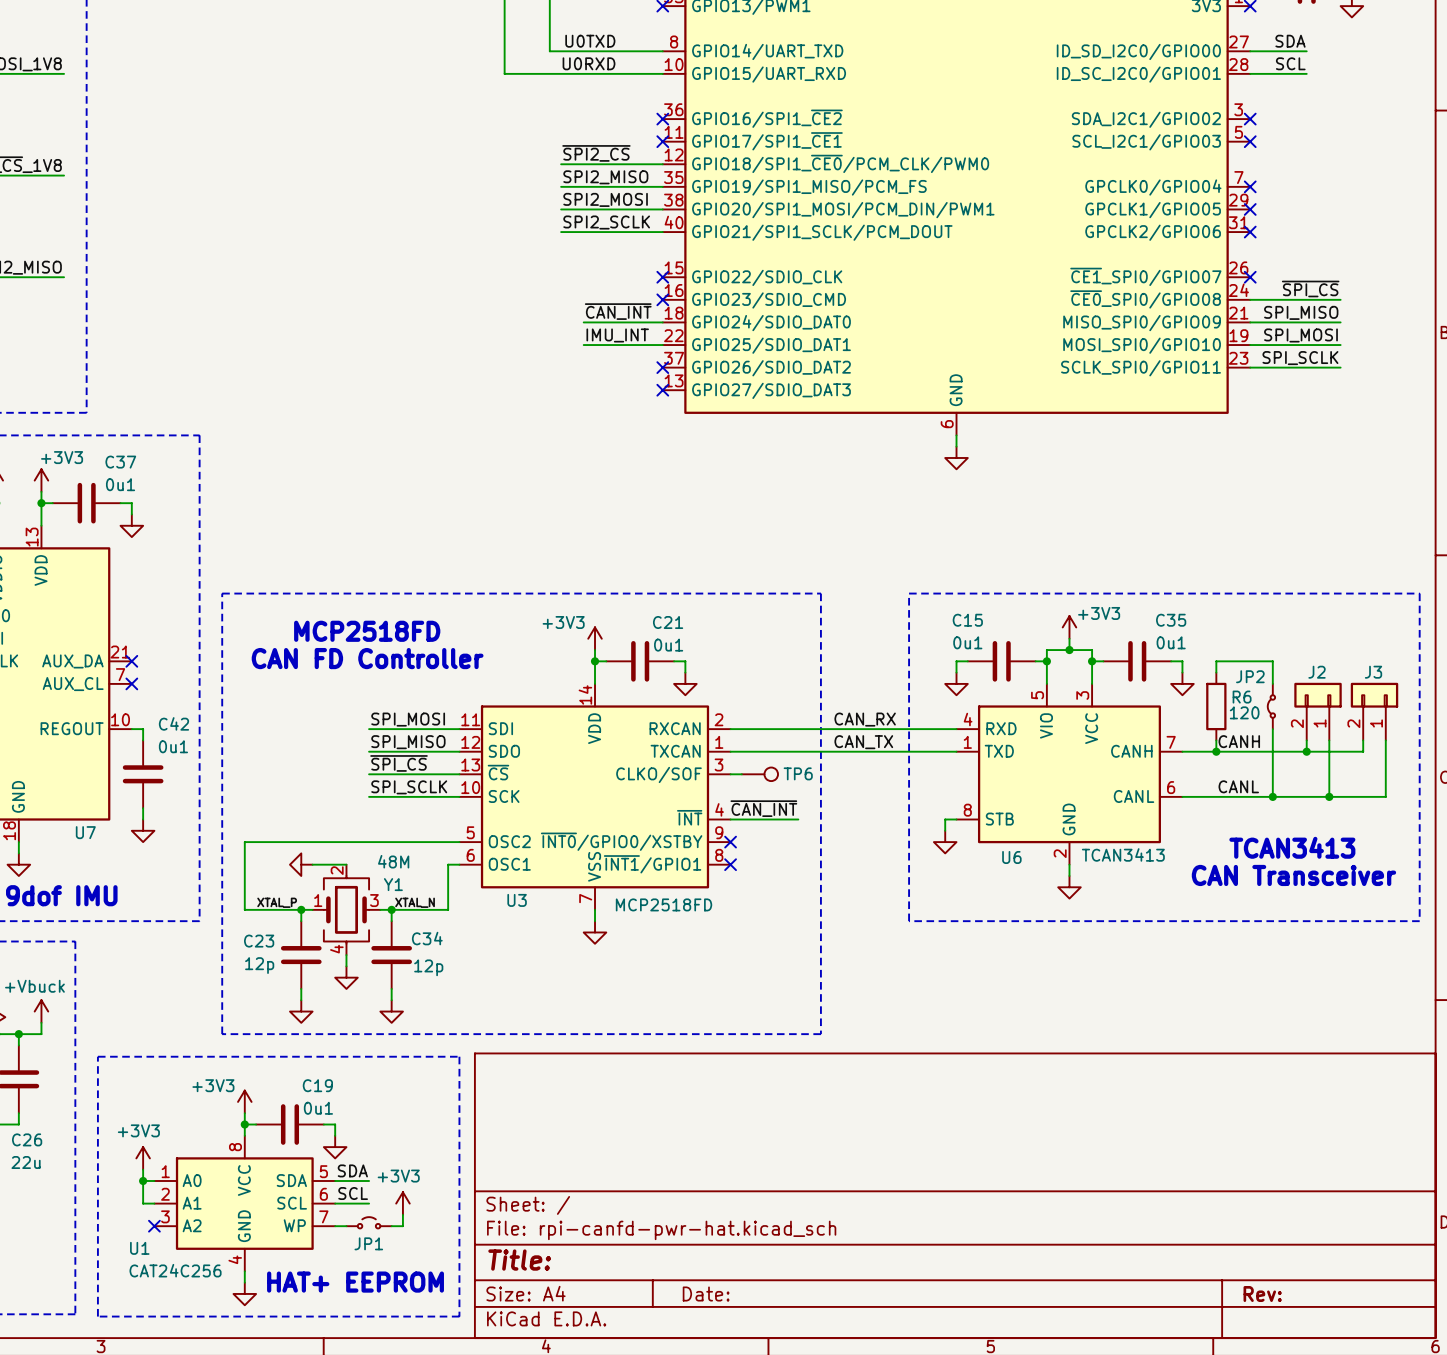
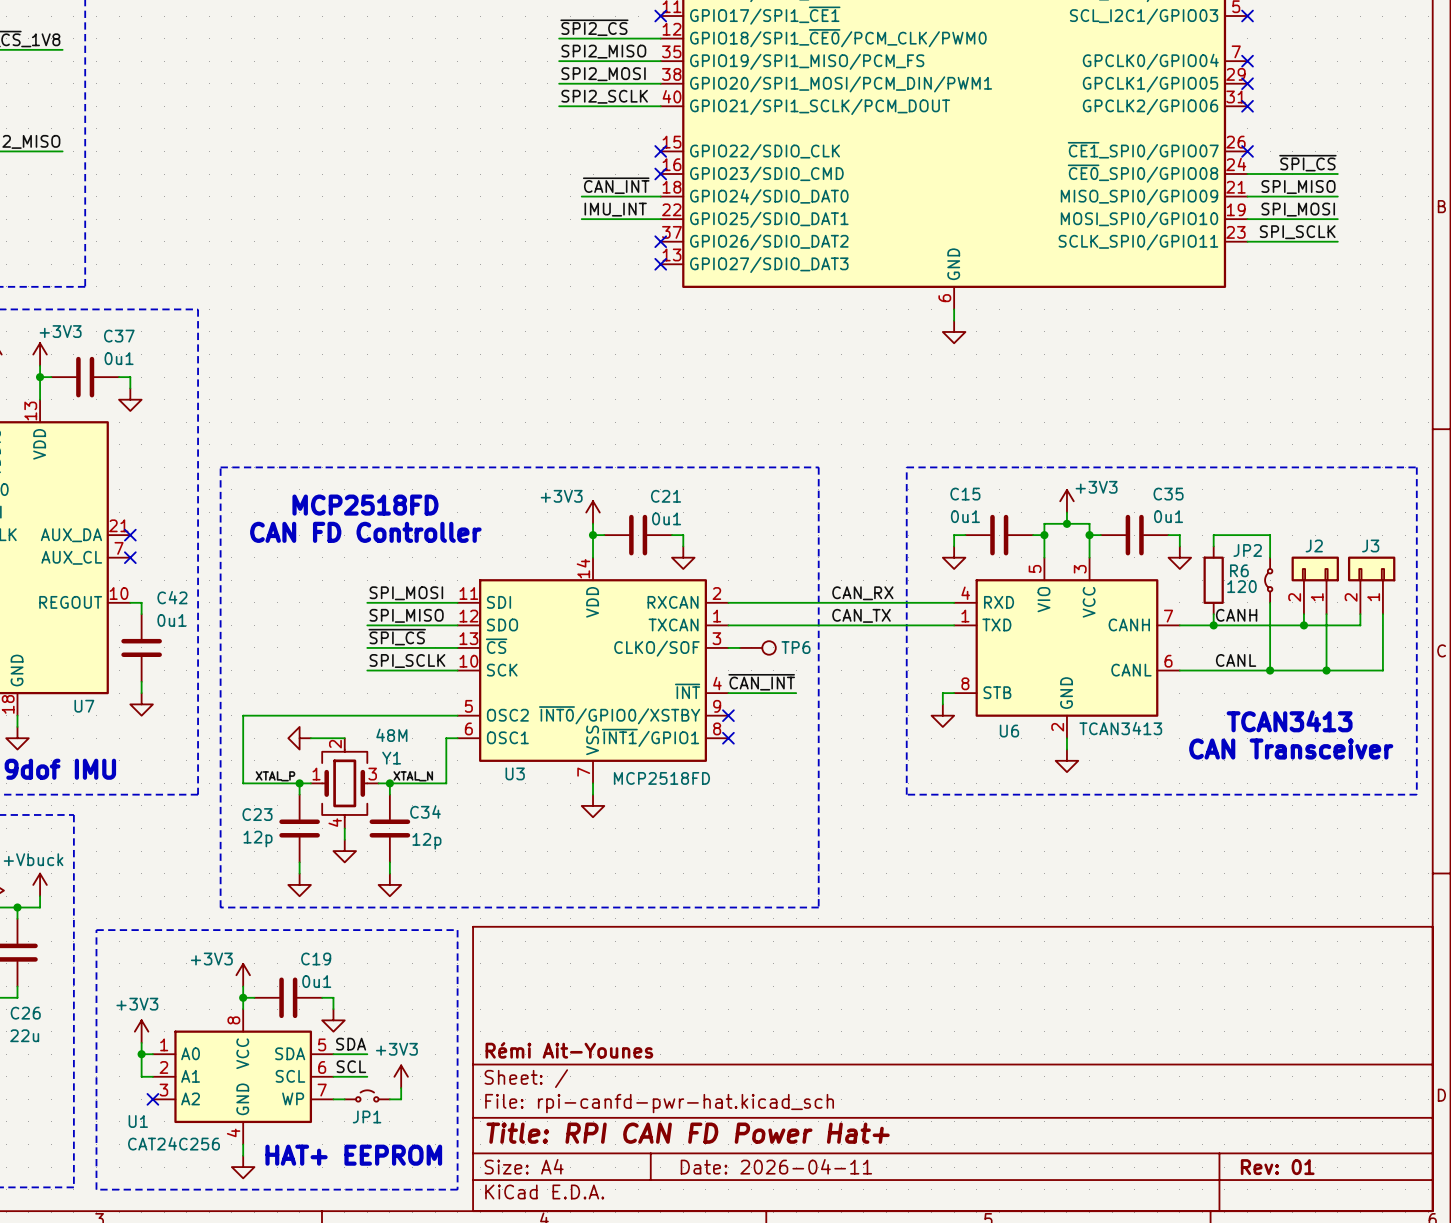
title block: none -> Rémi Ait-Younes (569, 1050)
title block: Title: (519, 1260) -> Title: RPI CAN FD Power Hat+ (688, 1133)
title block: Date: (706, 1294) -> Date: 2026-04-11 (776, 1166)
title block: Rev: (1262, 1294) -> Rev: 01 (1277, 1167)

